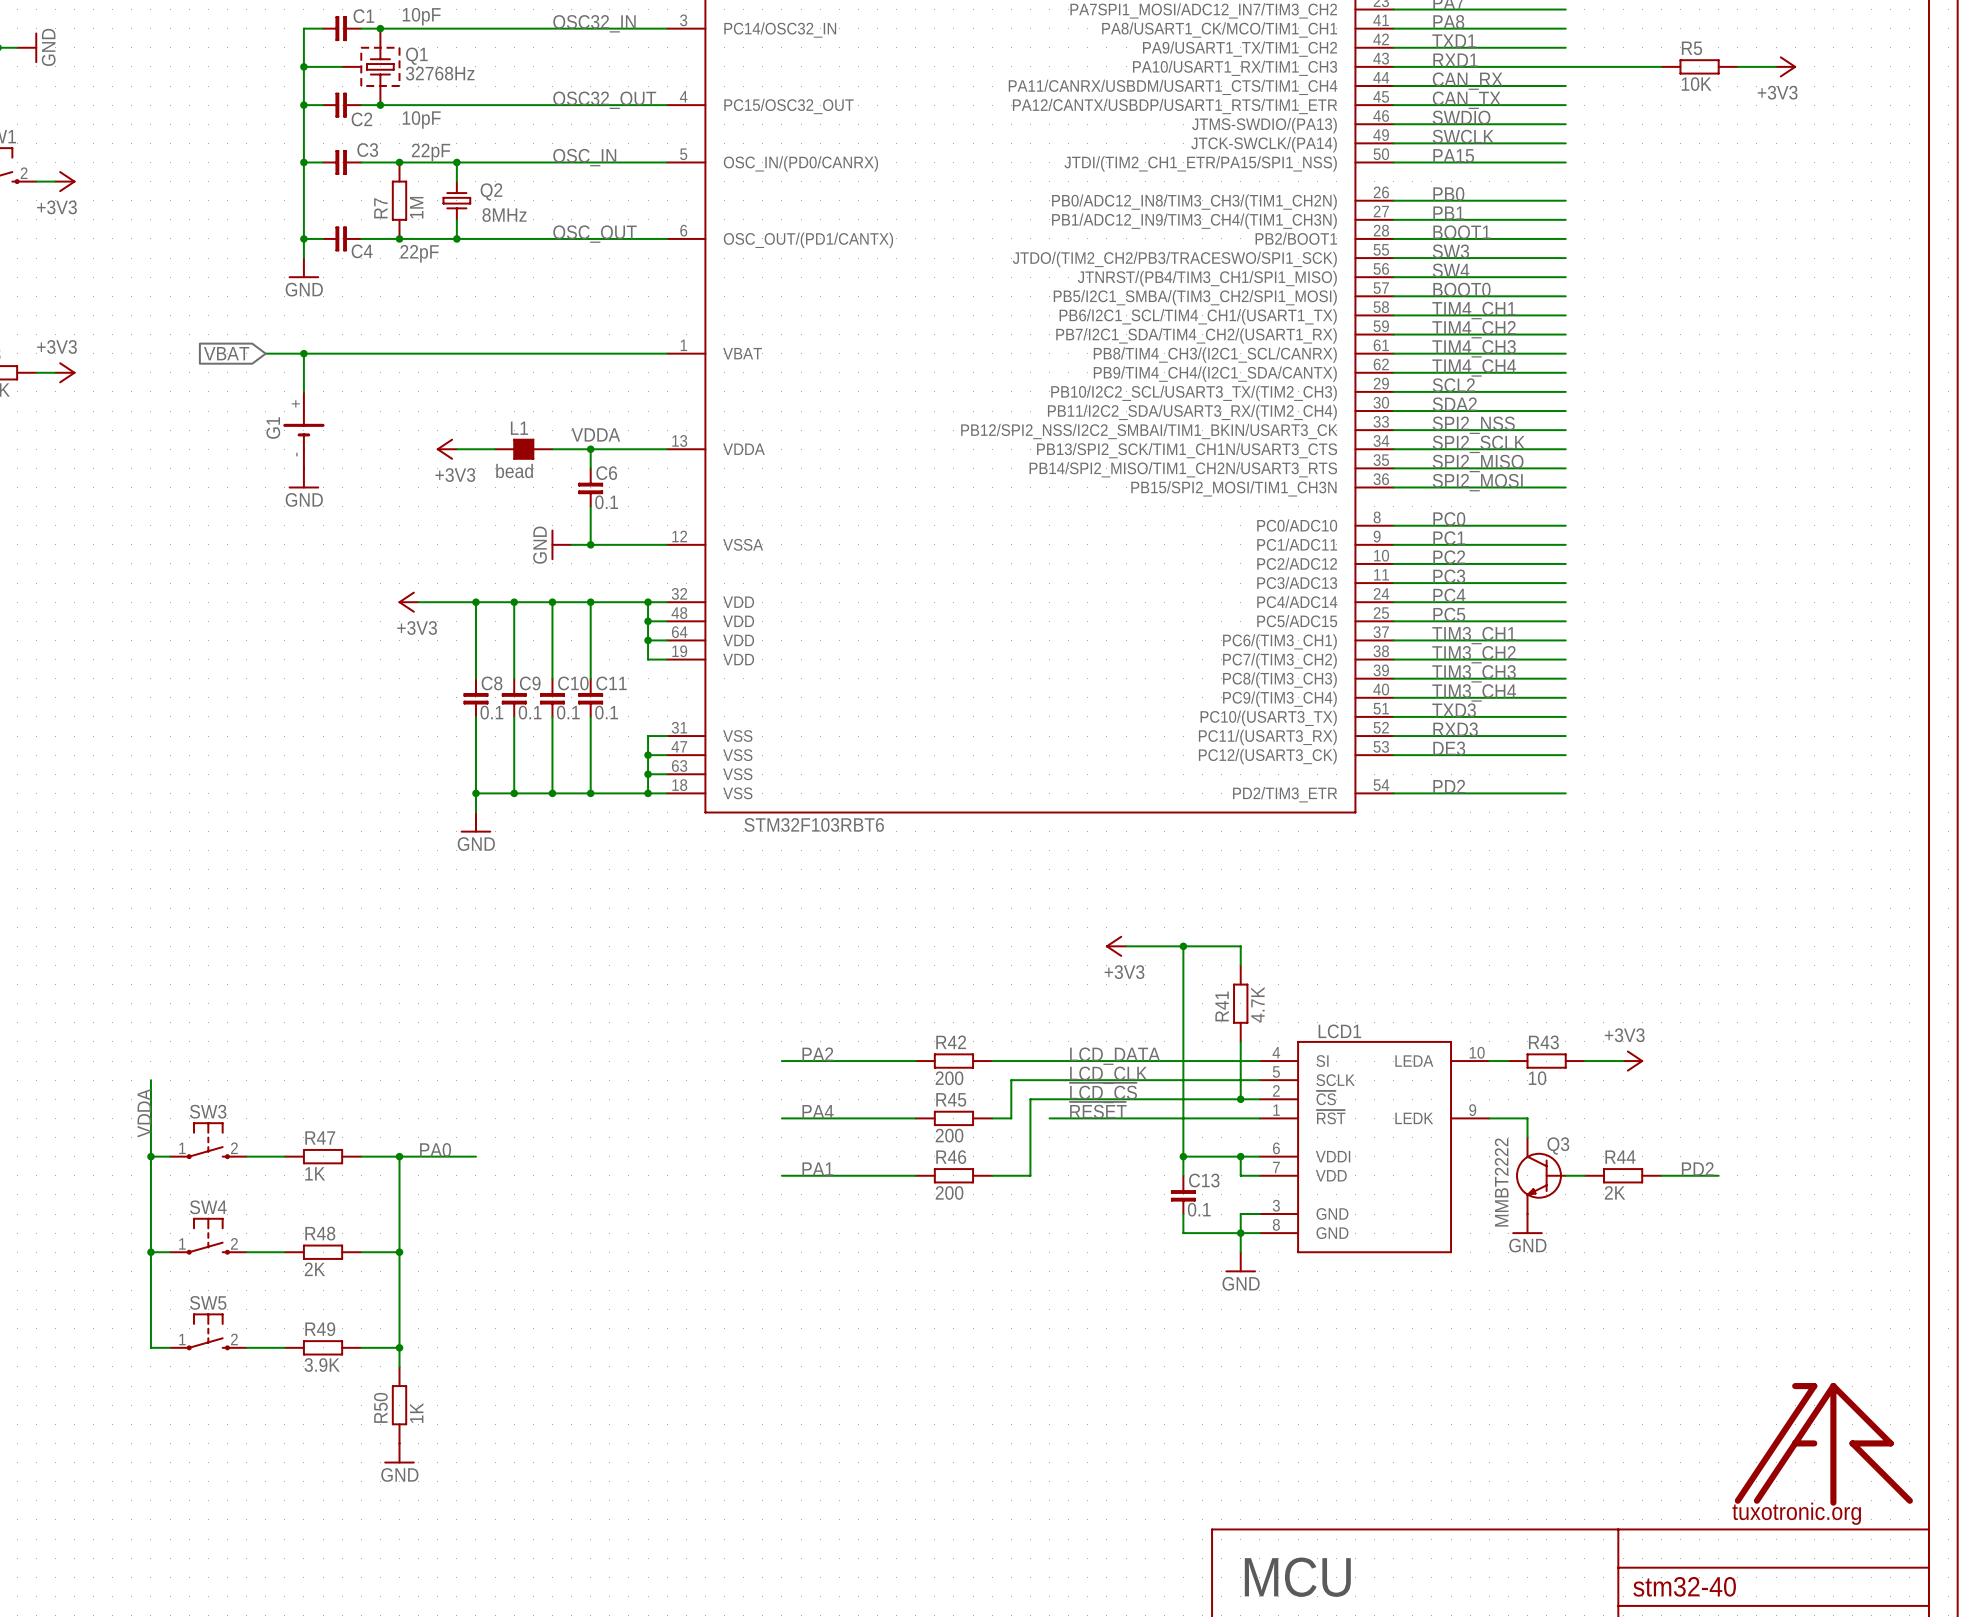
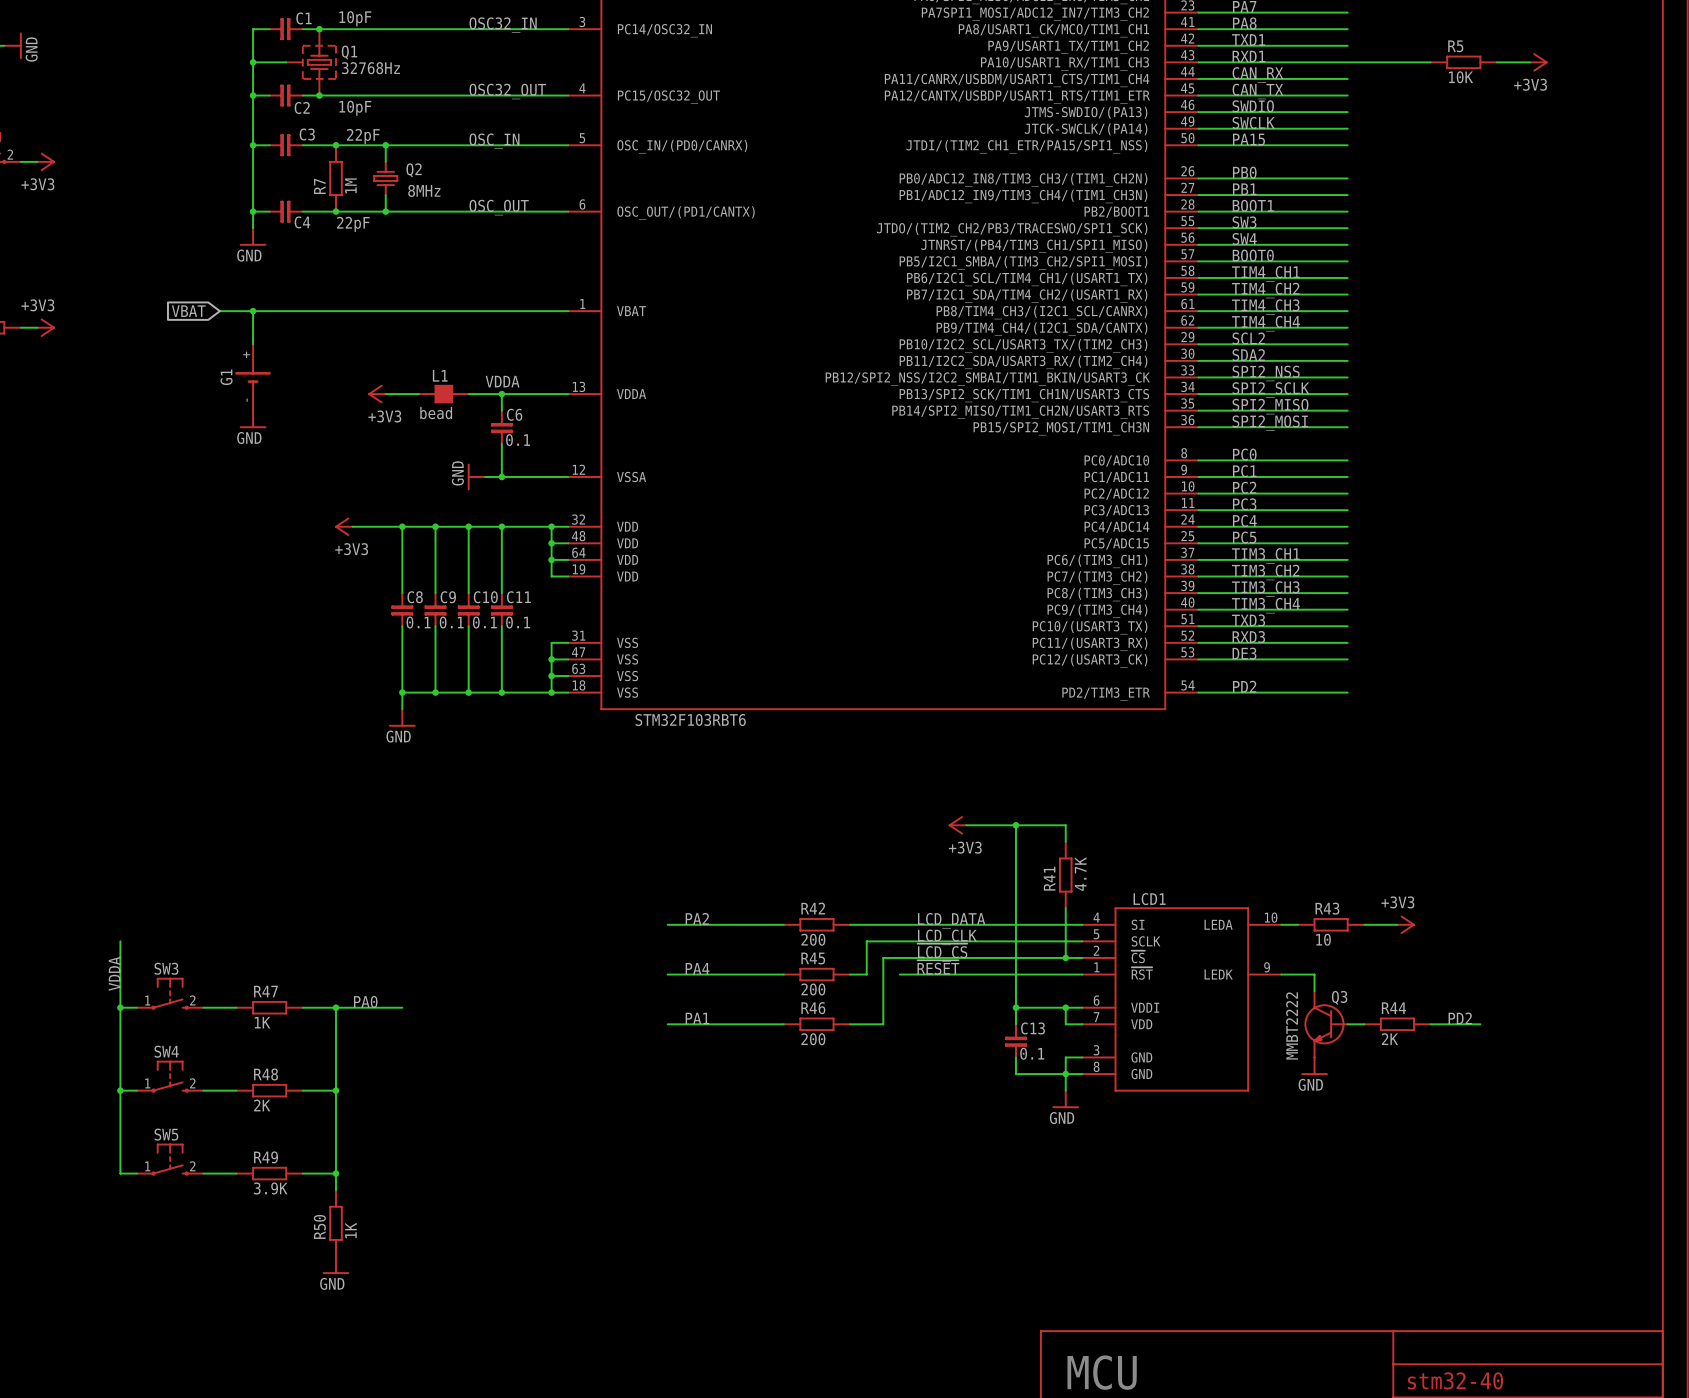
part: (1823, 1444) -> none

